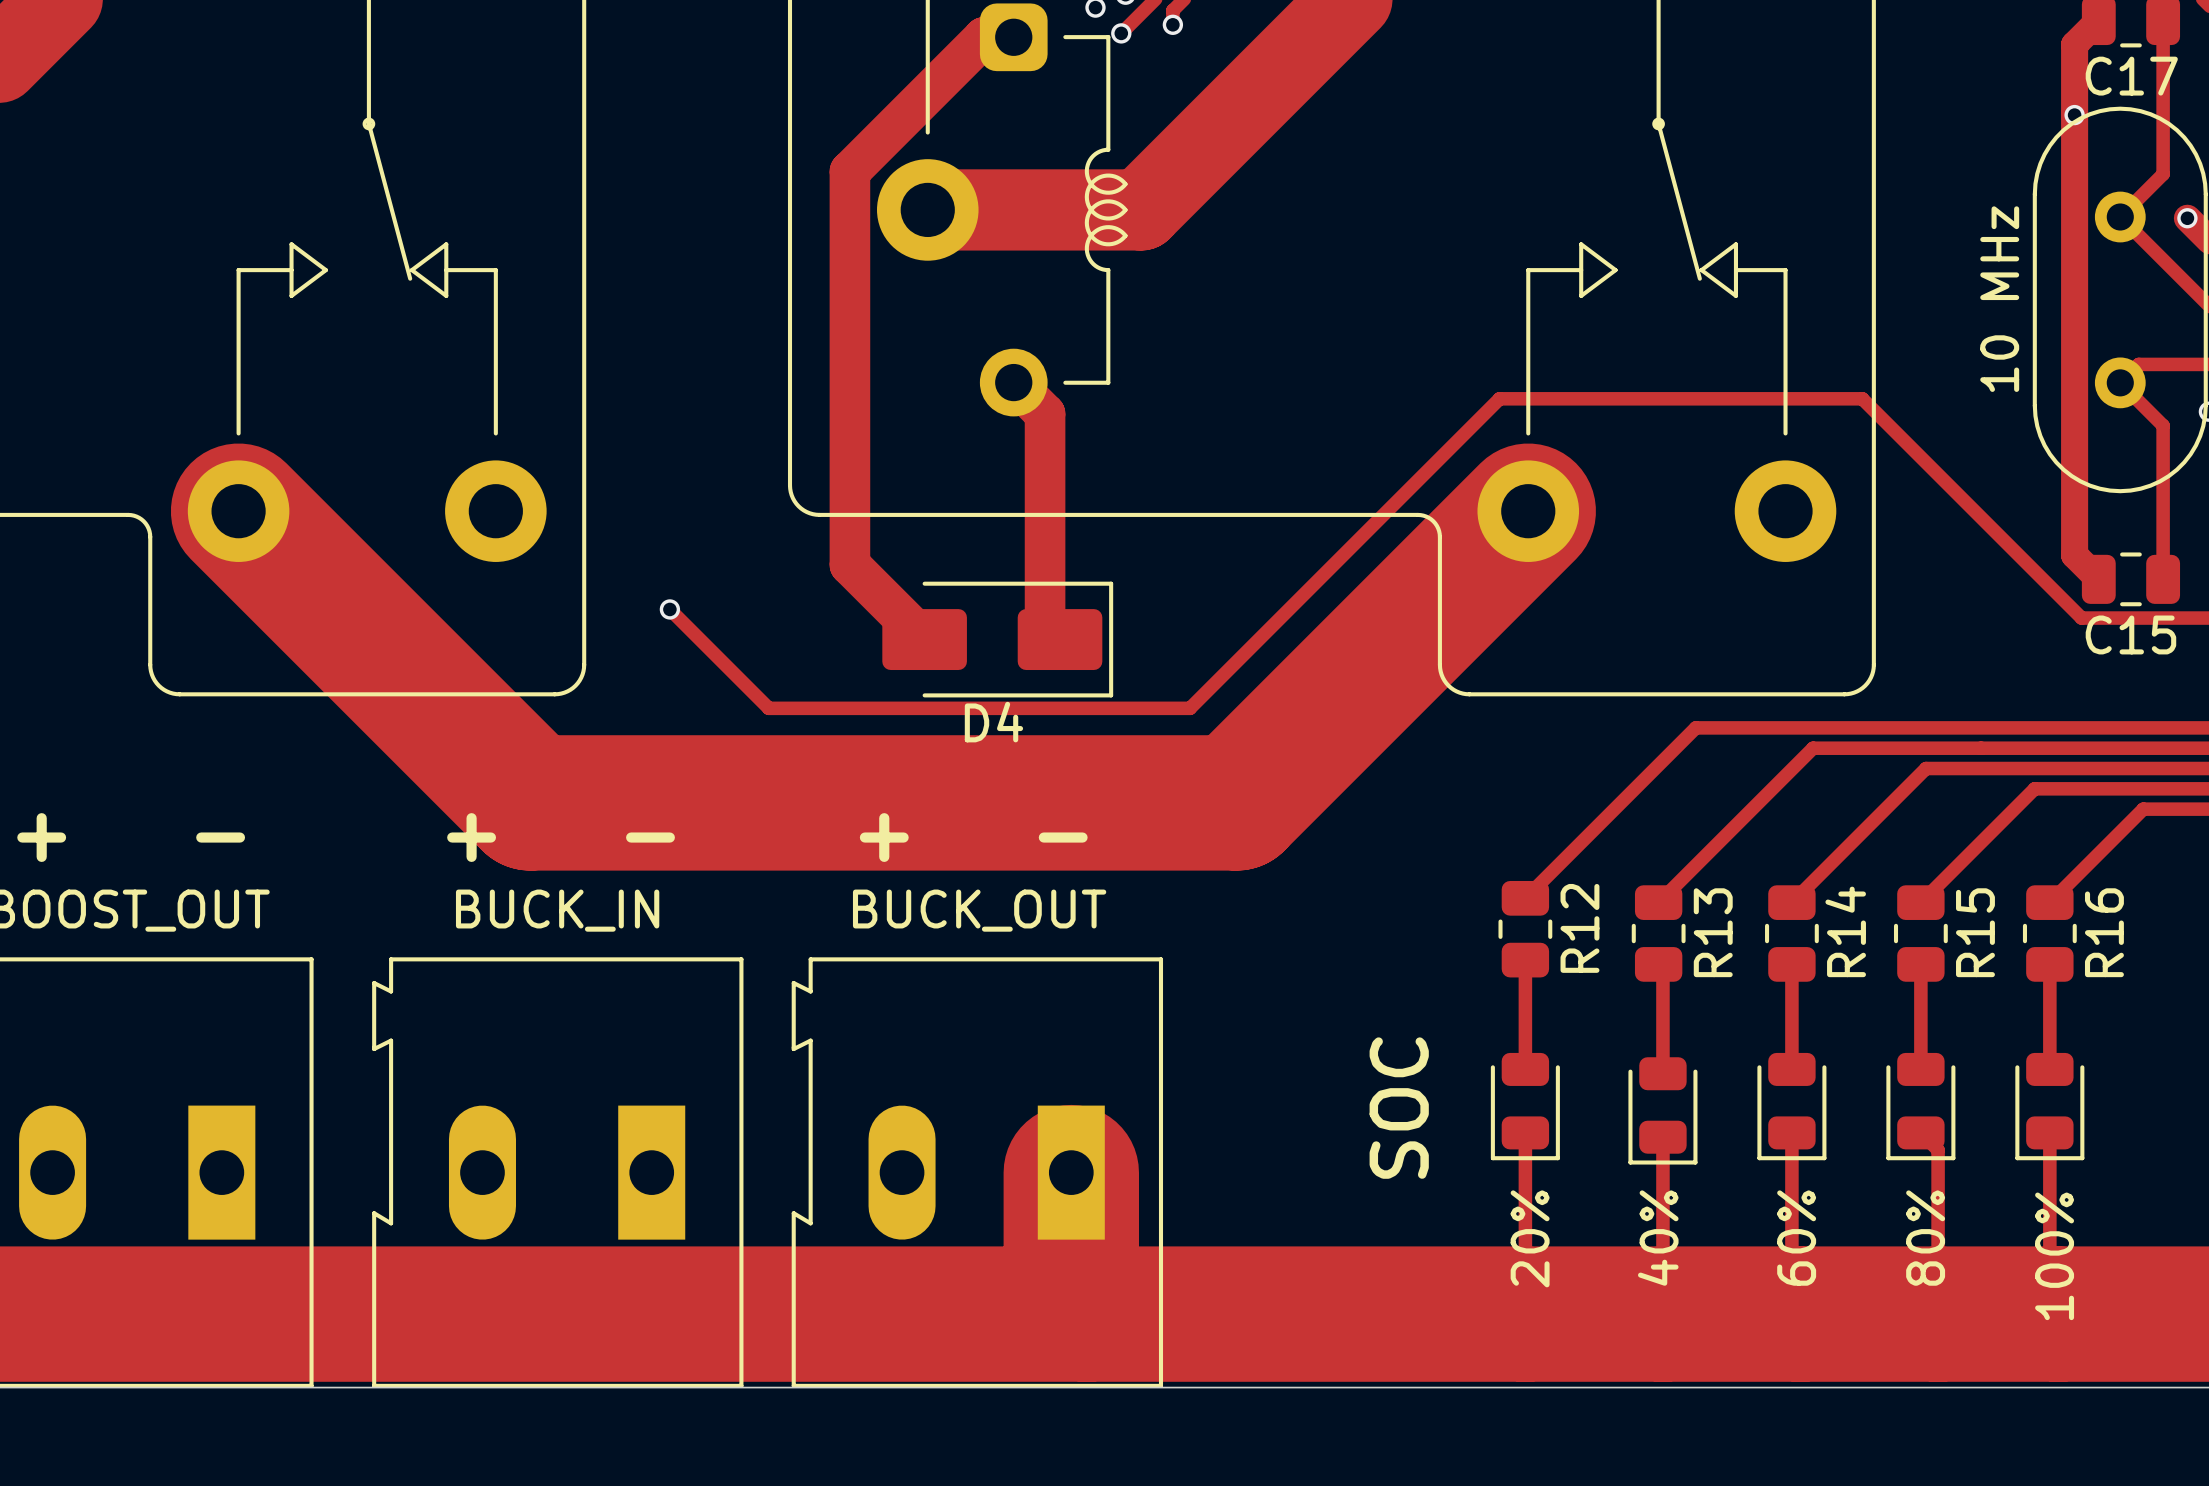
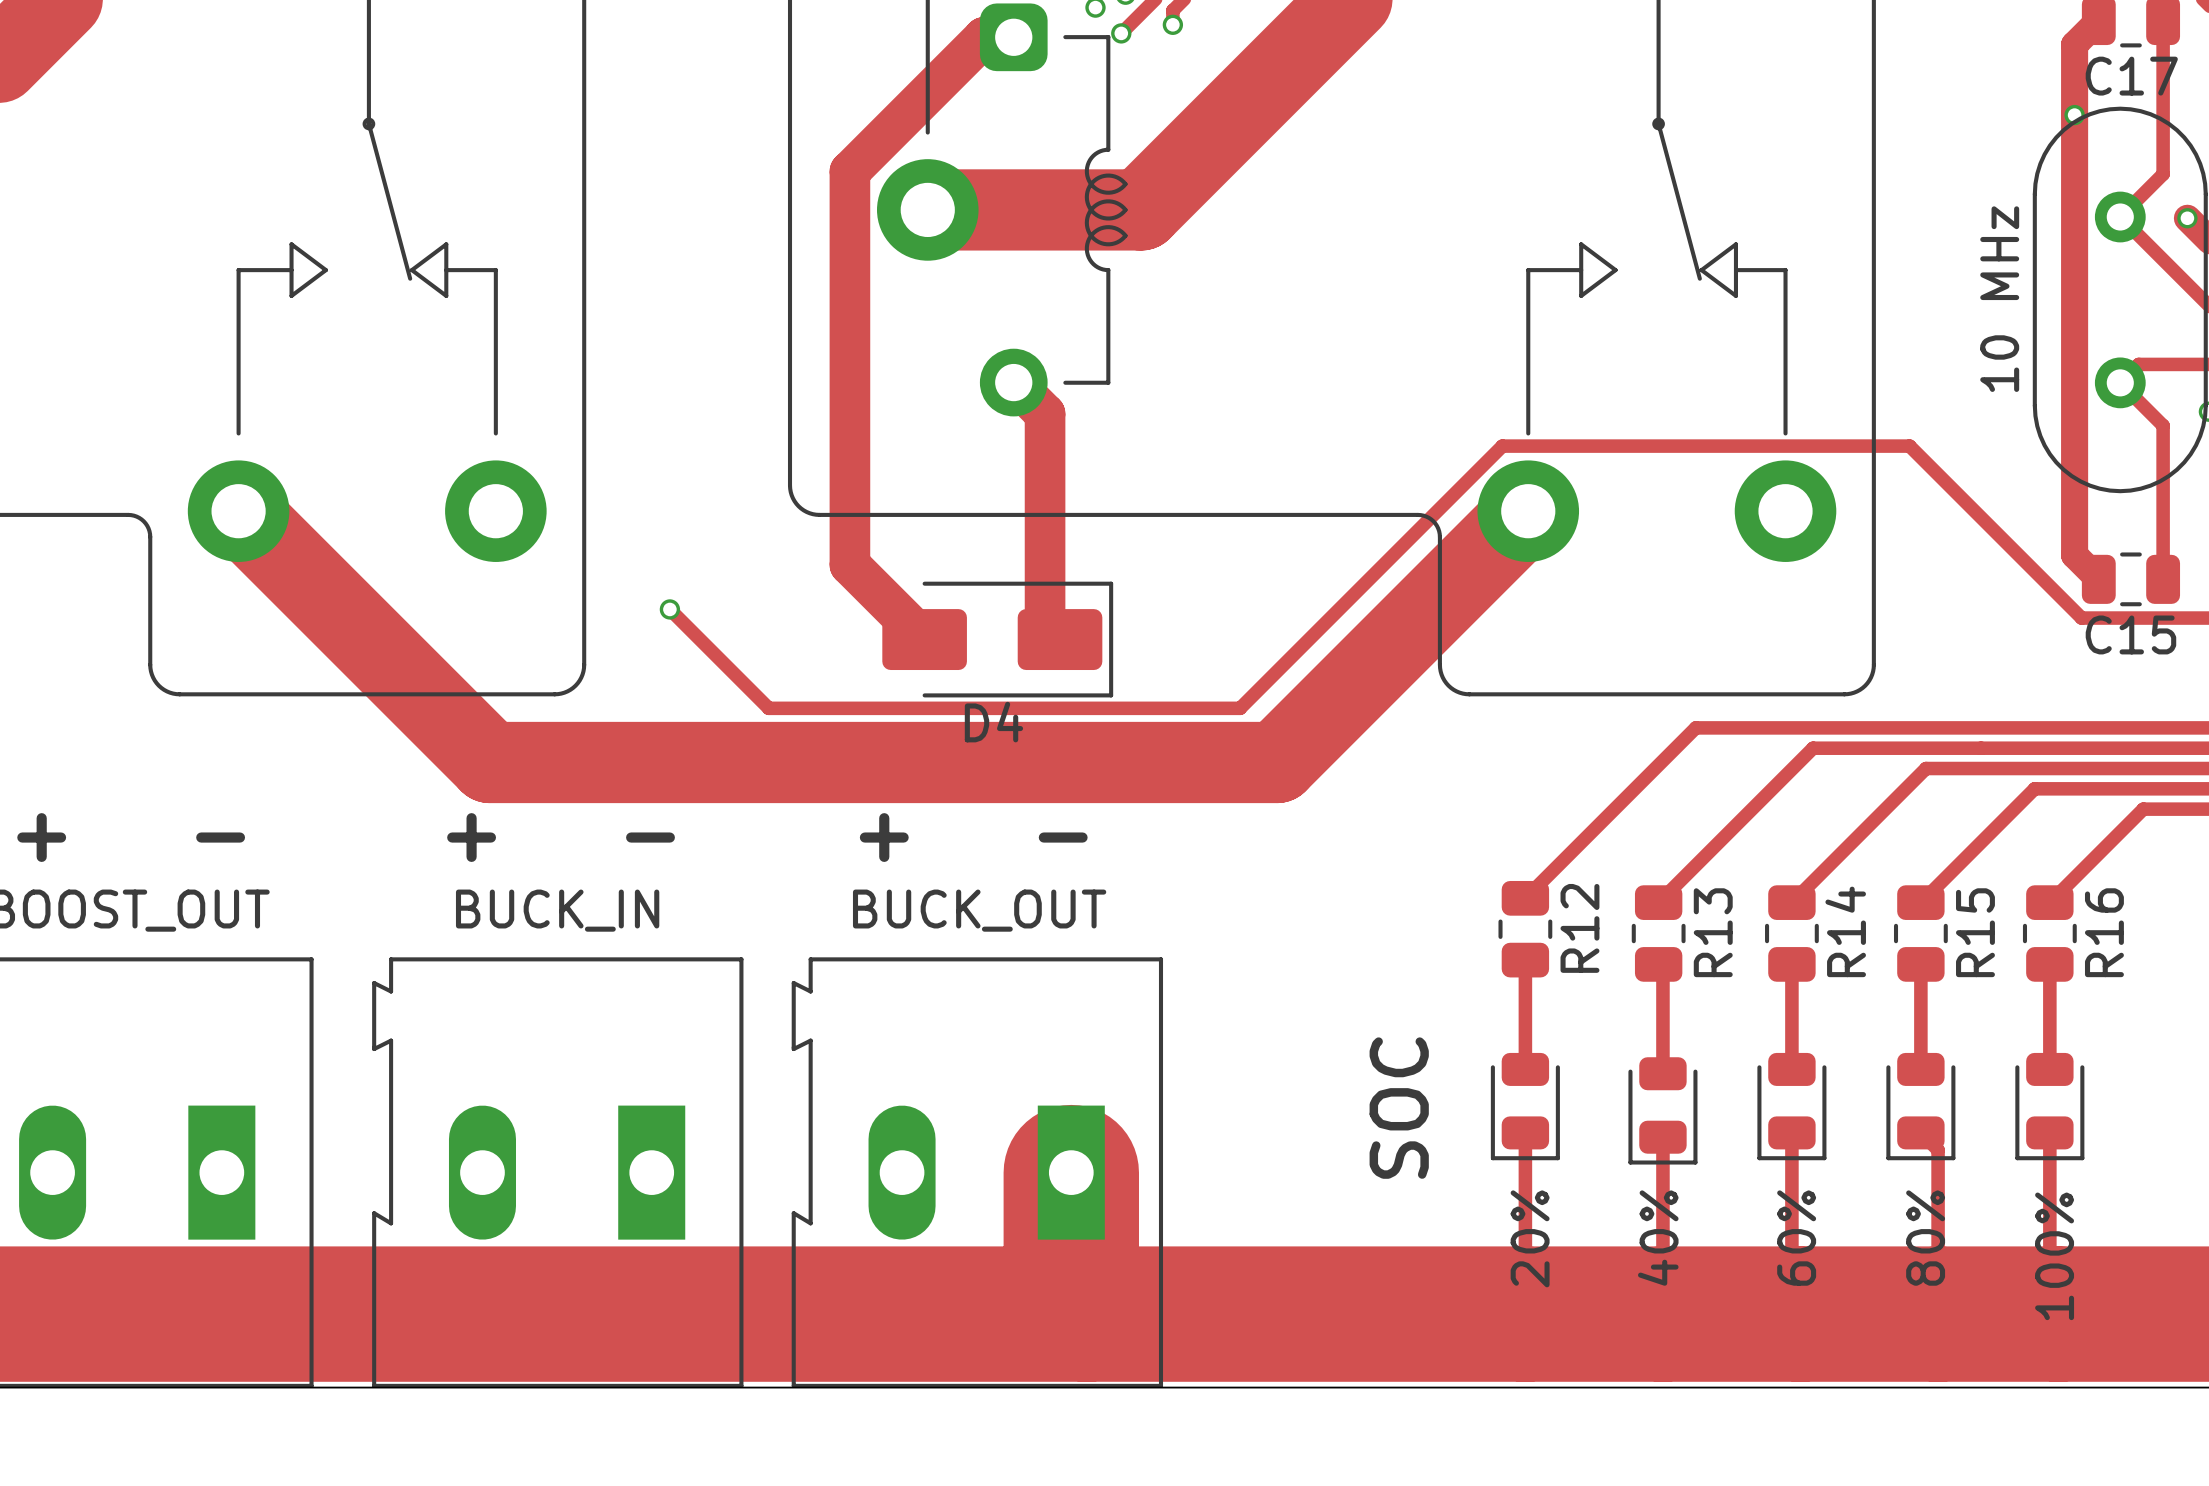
track: (1909, 446) (1862, 398) (1499, 398) (1190, 708) -> (1909, 446) (1502, 446) (1240, 708) (1190, 708)
track width: thick (238, 511) (489, 762) -> thin (238, 511) (489, 762)
track width: thick (1528, 511) (1276, 762) -> thin (1528, 511) (1276, 762)
track: (489, 762) (530, 802) (1236, 802) (1276, 762) -> (489, 762) (1276, 762)

